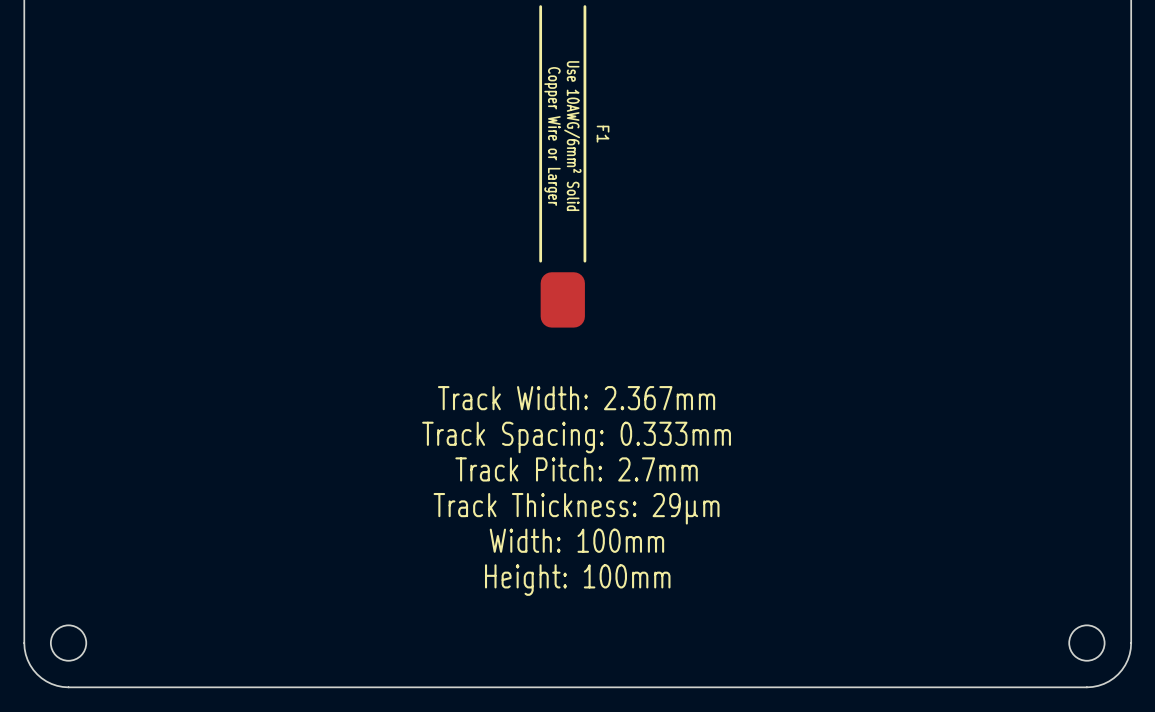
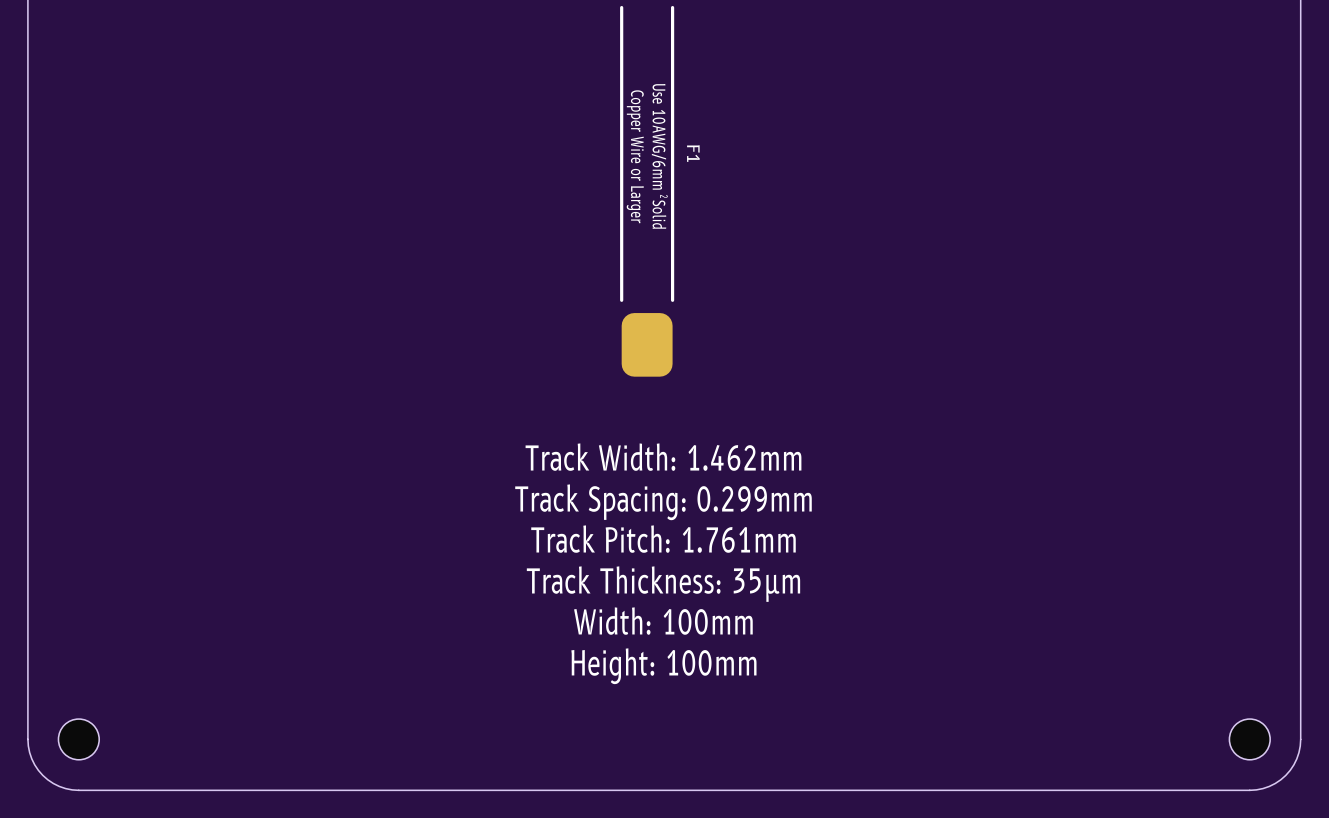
text: Track Width: 2.367mm (576, 398) -> Track Width: 1.462mm (663, 457)
text: Track Spacing: 0.333mm (576, 437) -> Track Spacing: 0.299mm (663, 502)
text: Track Pitch: 2.7mm (576, 469) -> Track Pitch: 1.761mm (663, 539)
text: Track Thickness: 29µm (576, 508) -> Track Thickness: 35µm (663, 584)

